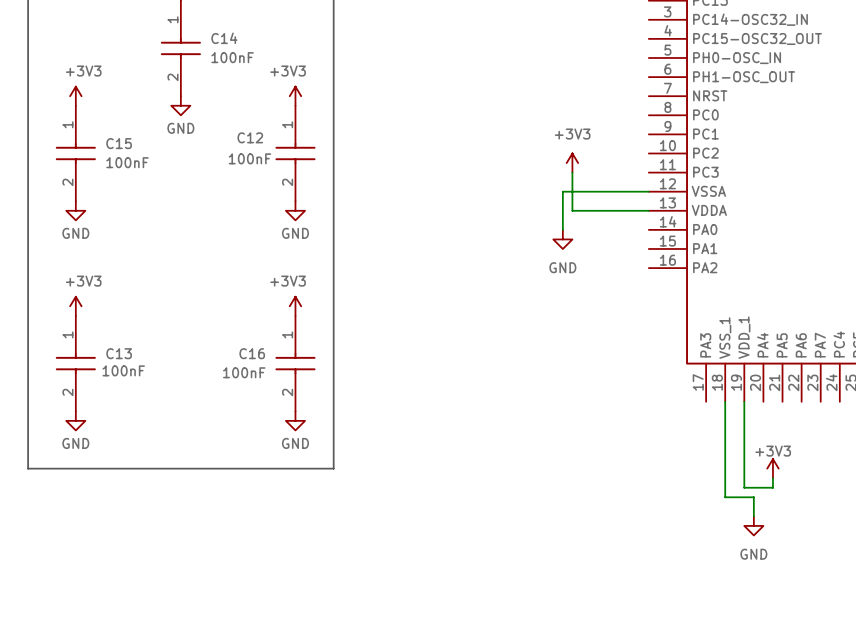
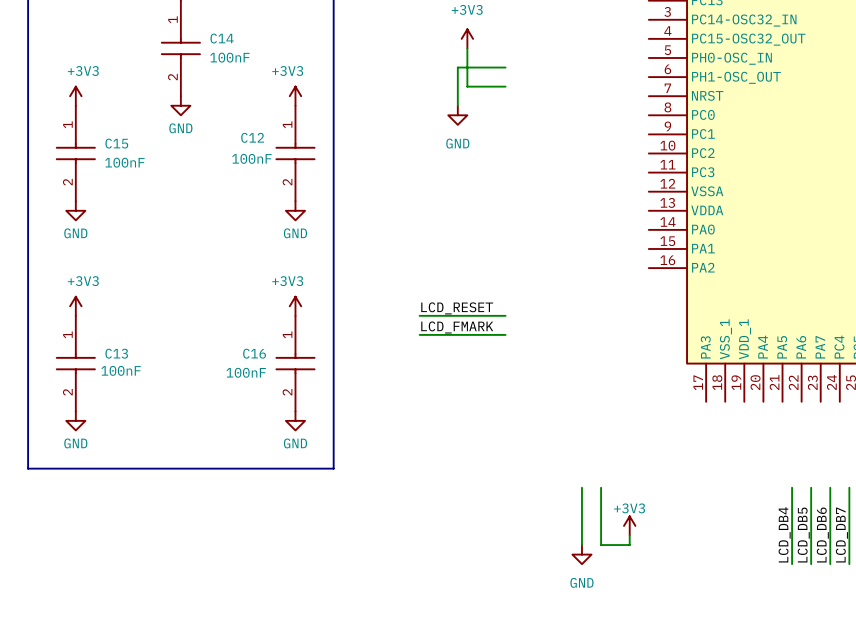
power symbol: none -> +3V3 (467, 38)
wire: none -> (467, 48) (467, 86) (505, 86)
wire: none -> (505, 67) (457, 67) (457, 105)
power symbol: none -> GND (457, 115)
power symbol: +3V3 (572, 163) -> none
wire: (572, 172) (572, 210) (648, 210) -> none
wire: (648, 191) (562, 191) (562, 229) -> none
power symbol: GND (562, 239) -> none
label: none -> LCD_RESET (457, 308)
wire: none -> (419, 315) (505, 315)
label: none -> LCD_FMARK (457, 327)
wire: none -> (419, 334) (505, 334)
wire: (725, 401) (725, 497) (753, 497) (753, 516) -> none
wire: (744, 401) (744, 487) (772, 487) (772, 478) -> none
power symbol: +3V3 (772, 468) -> none
wire: none -> (581, 487) (581, 545)
wire: none -> (601, 487) (601, 545) (629, 545) (629, 535)
wire: none -> (792, 487) (792, 564)
wire: none -> (811, 487) (811, 564)
wire: none -> (830, 487) (830, 564)
wire: none -> (849, 487) (849, 564)
power symbol: none -> +3V3 (629, 525)
power symbol: GND (753, 525) -> none
label: none -> LCD_DB4 (784, 534)
label: none -> LCD_DB7 (841, 535)
label: none -> LCD_DB5 (803, 535)
label: none -> LCD_DB6 (822, 535)
power symbol: none -> GND (581, 554)

